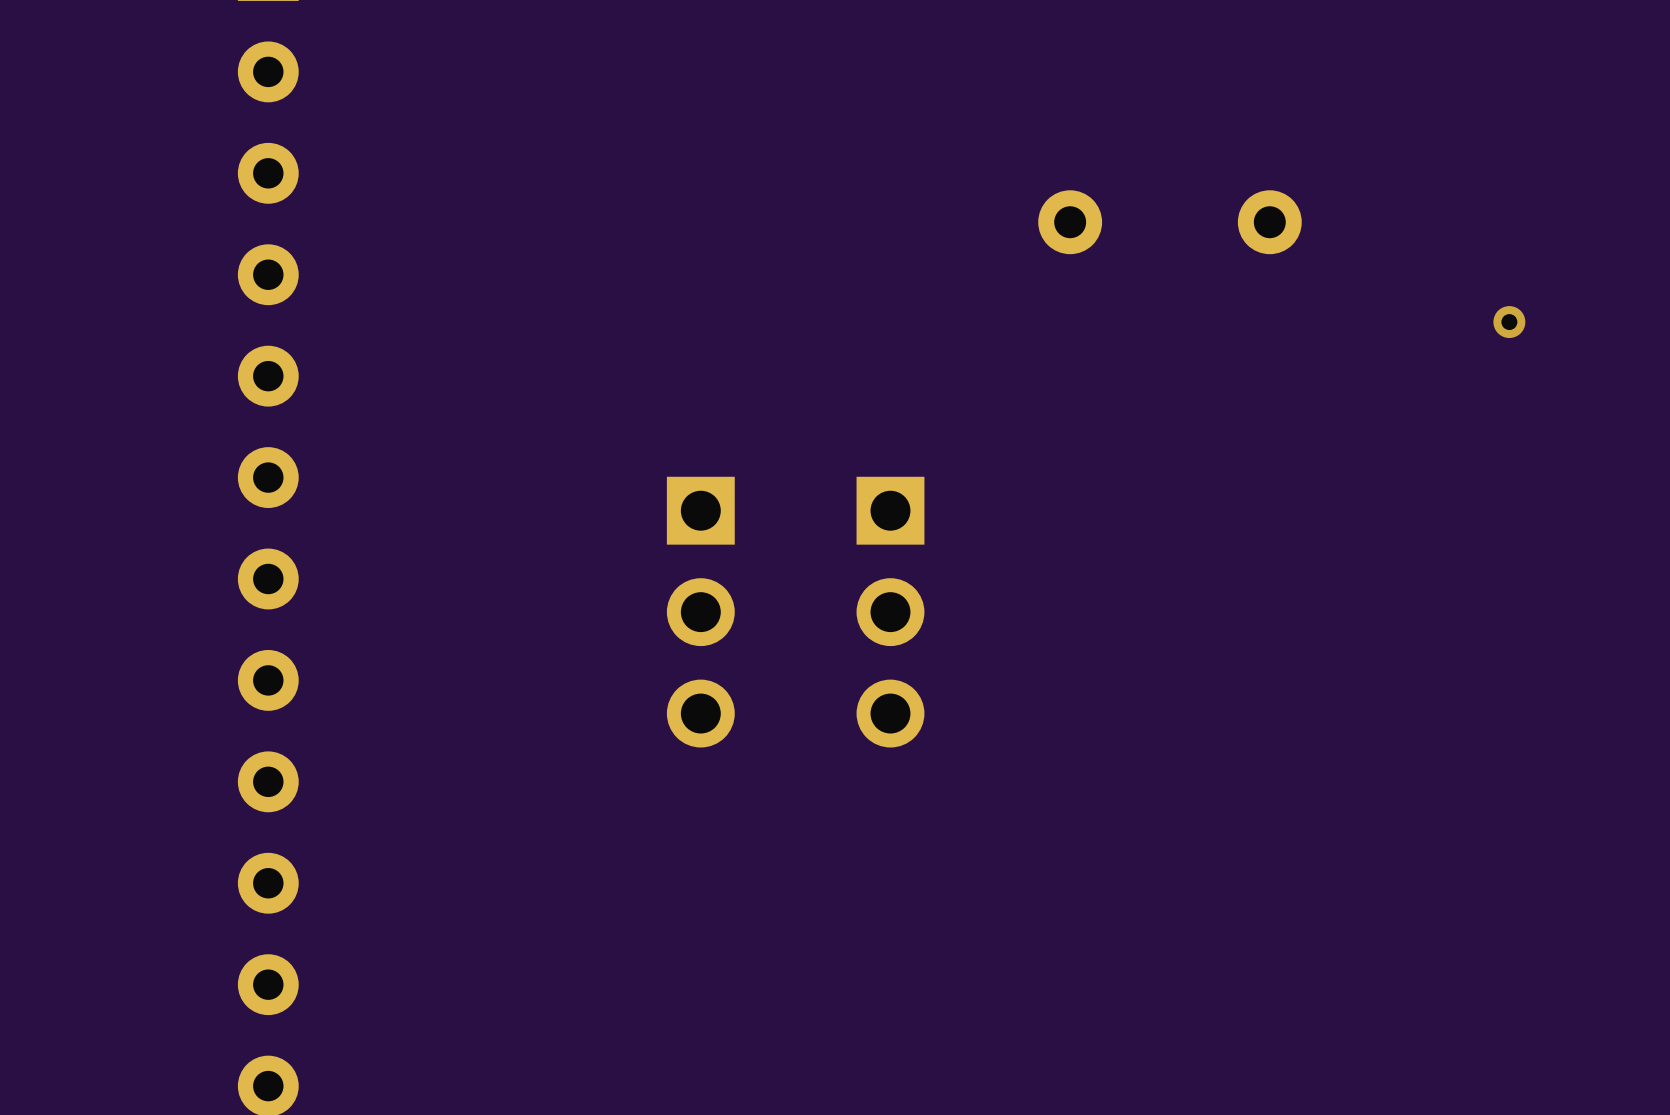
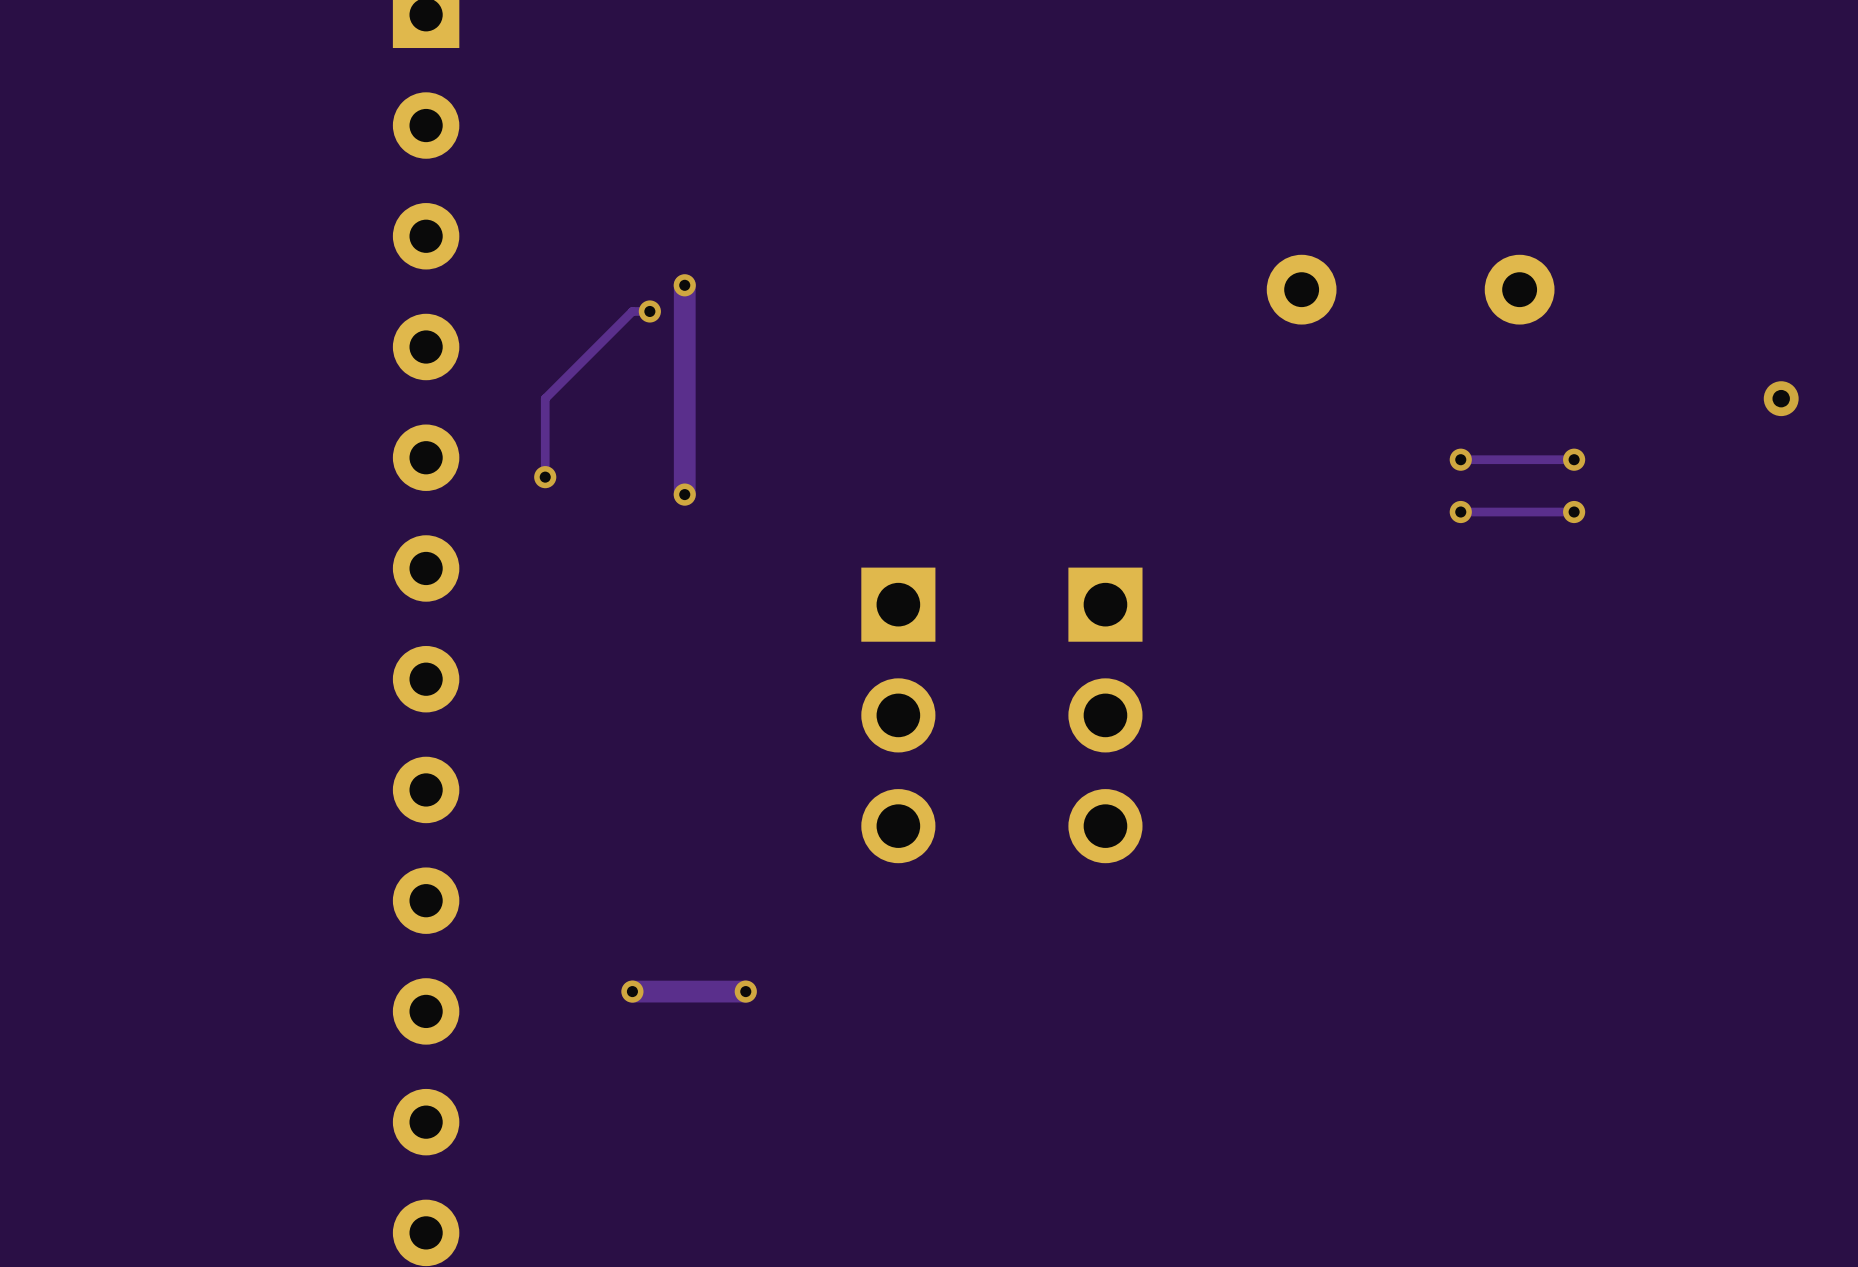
track: none -> (684, 285) (684, 494)
via: none -> (684, 285)
track: none -> (649, 311) (632, 311) (545, 398) (545, 477)
via: none -> (649, 311)
via: none -> (1460, 459)
track: none -> (1574, 459) (1460, 459)
via: none -> (1574, 459)
via: none -> (545, 477)
via: none -> (684, 494)
via: none -> (1460, 512)
track: none -> (1574, 512) (1460, 512)
via: none -> (1574, 512)
via: none -> (632, 991)
track: none -> (745, 991) (632, 991)
via: none -> (745, 991)

